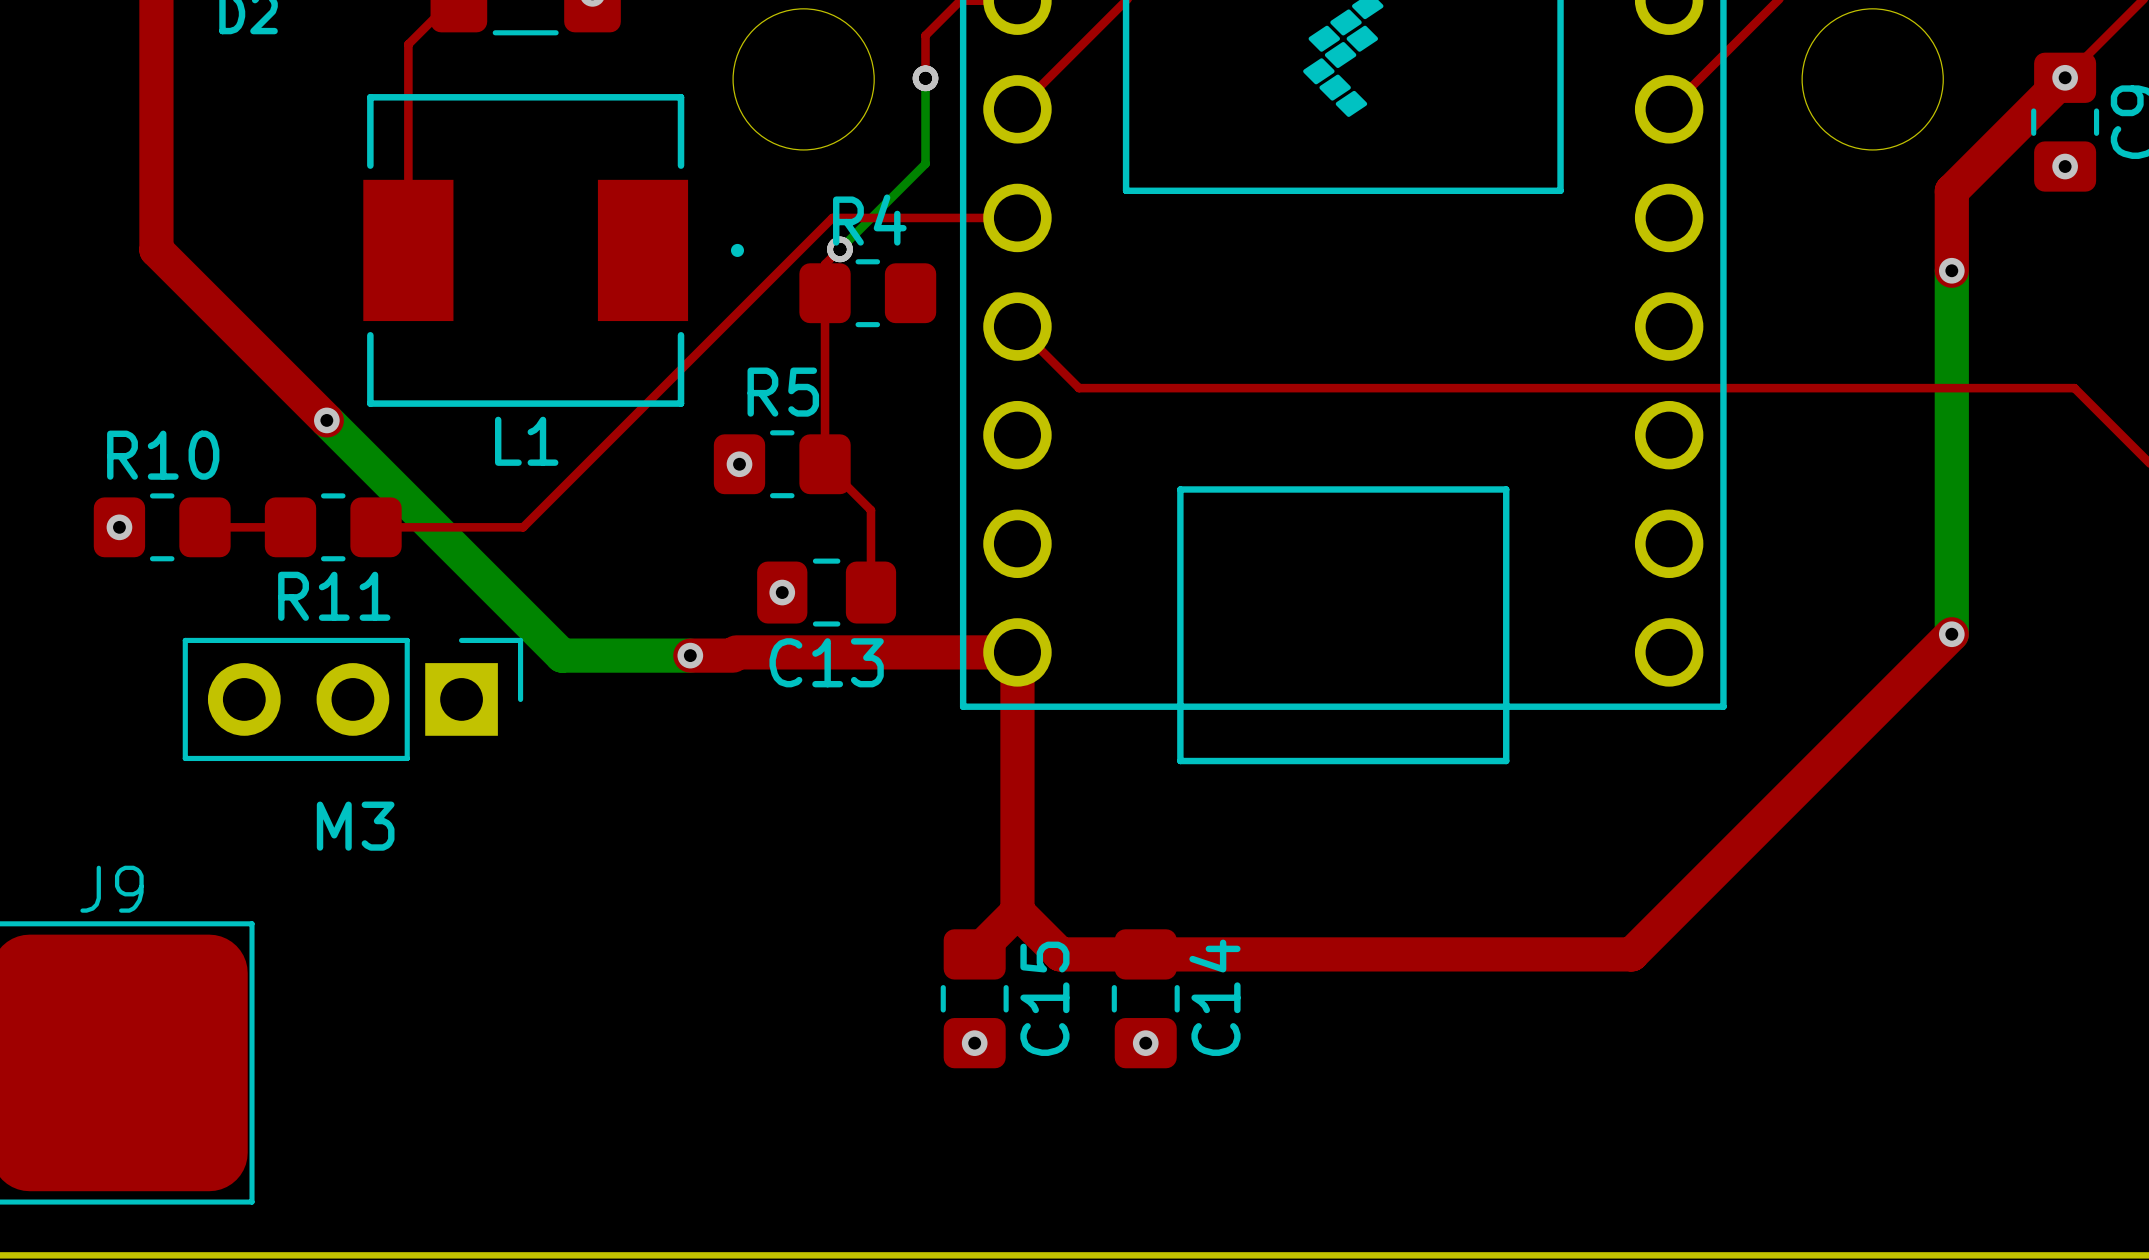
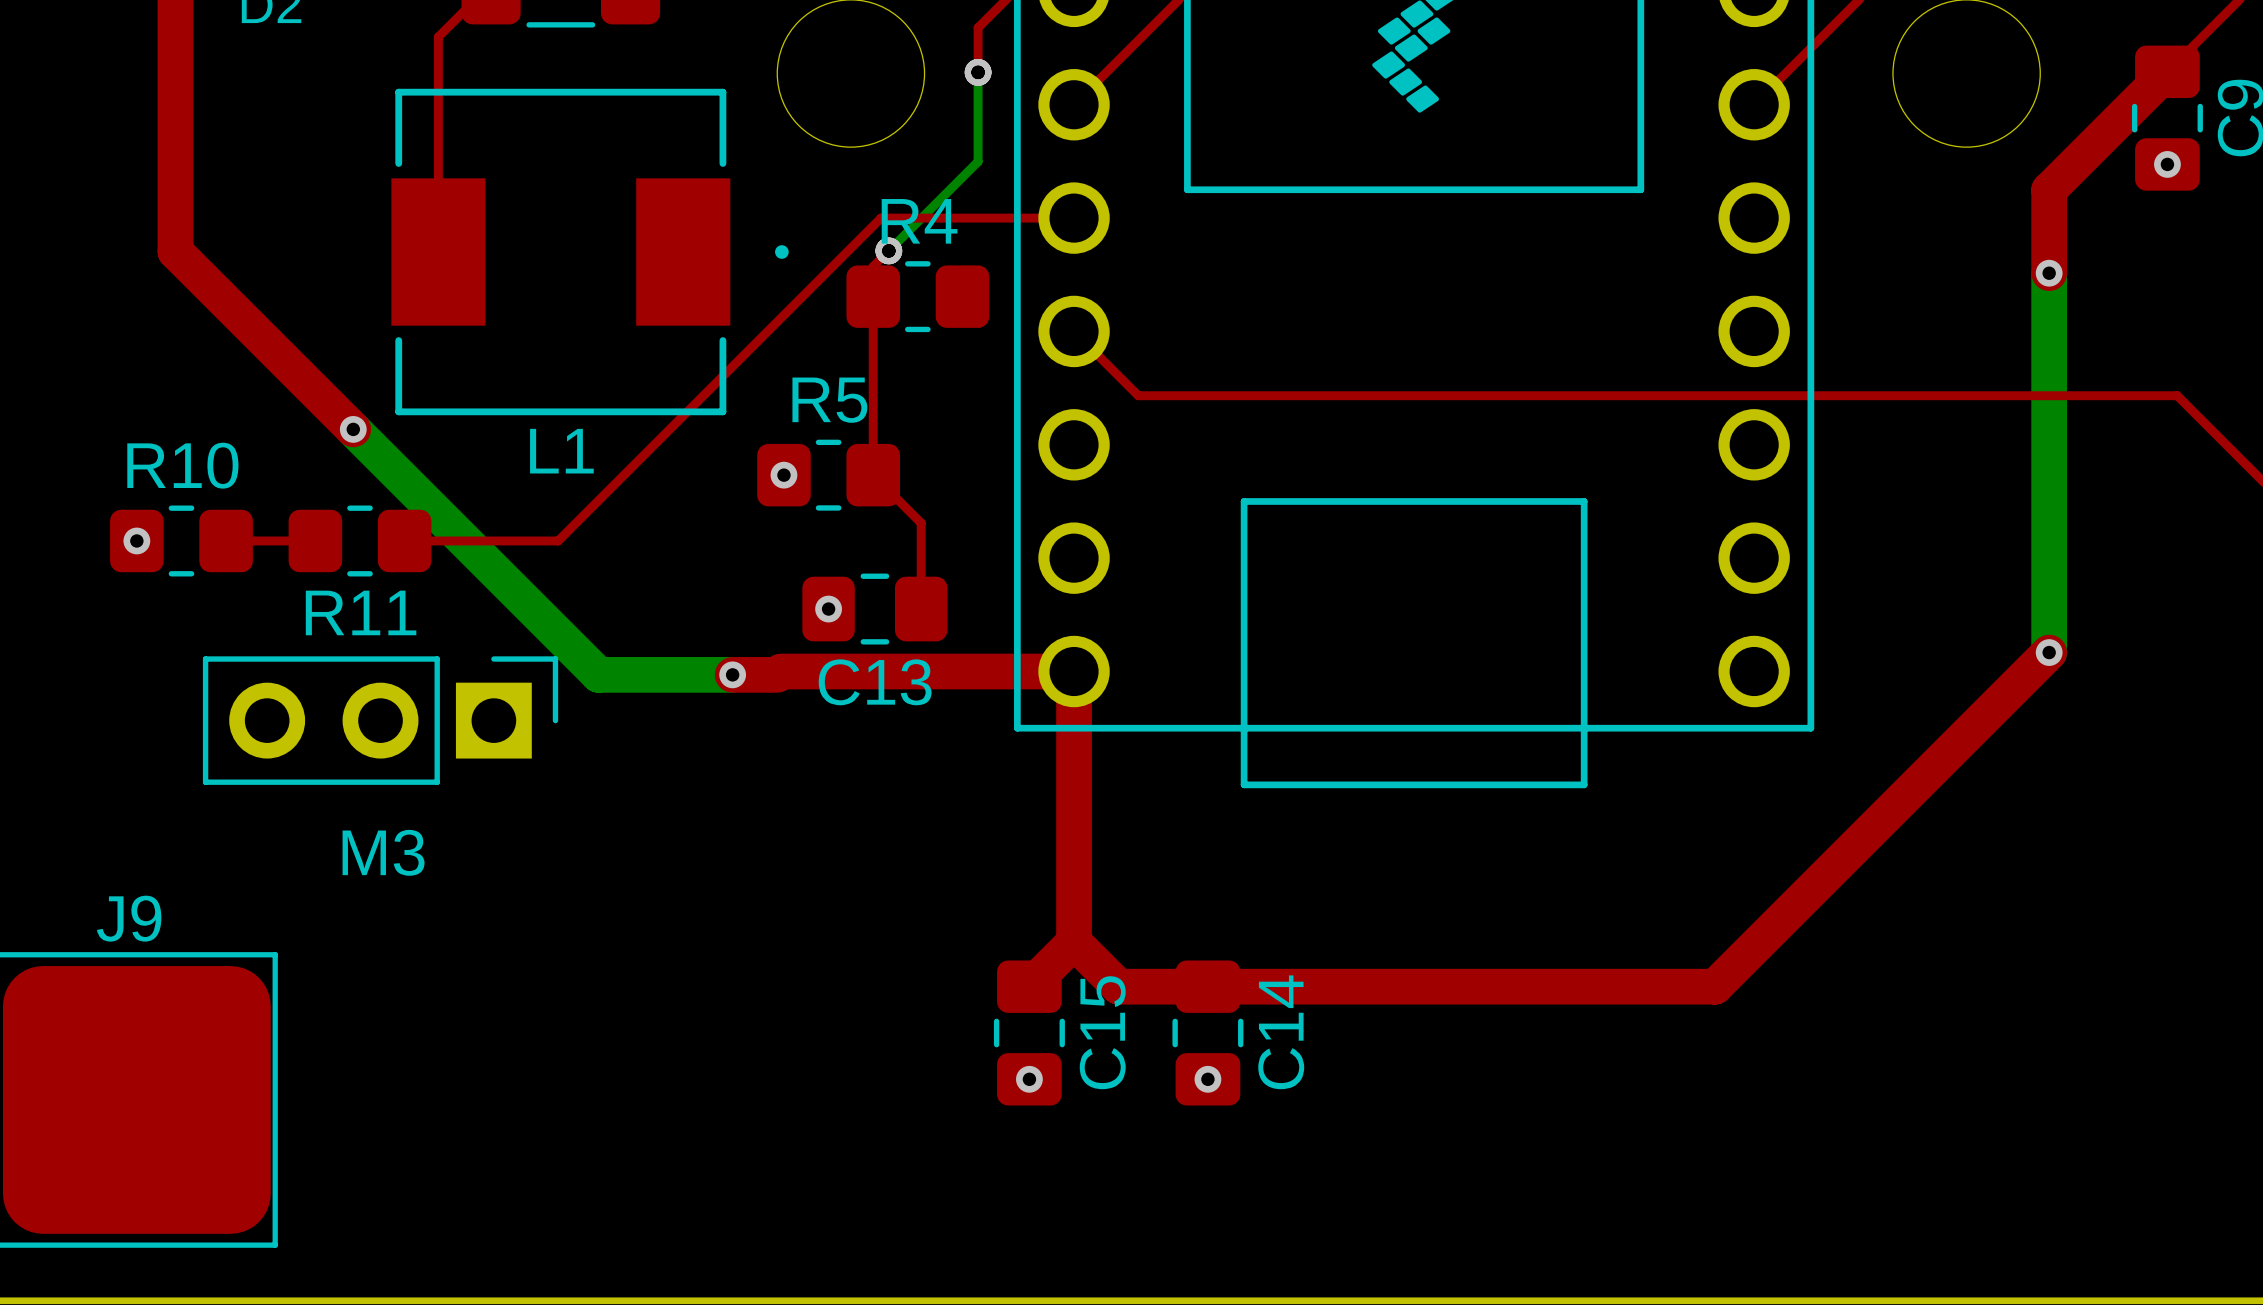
via: (2065, 77) -> none

